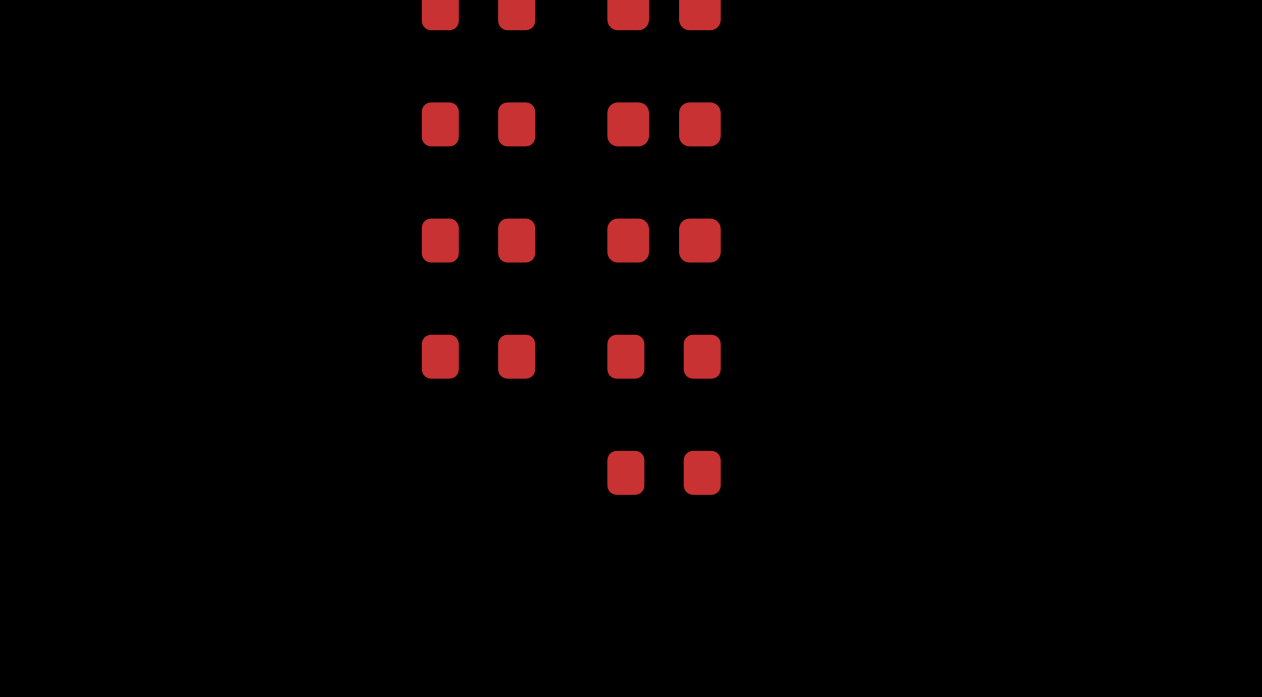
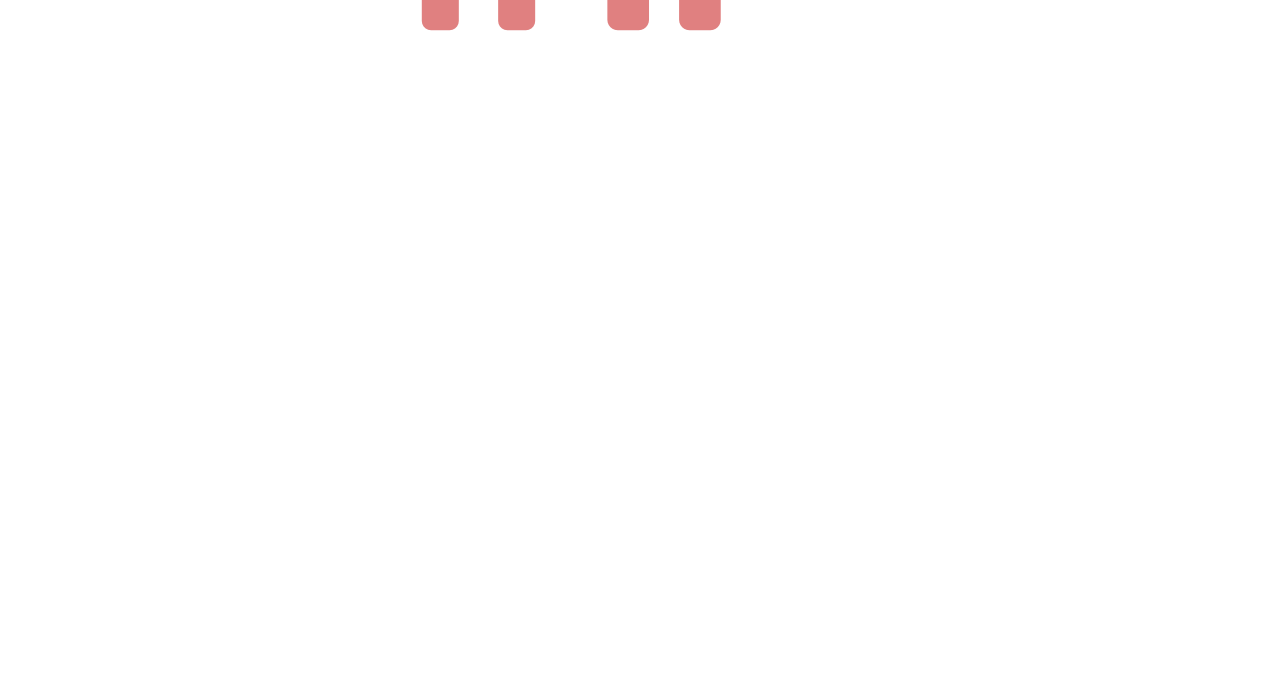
part: (478, 124) -> none
part: (664, 124) -> none
part: (478, 240) -> none
part: (664, 240) -> none
part: (478, 356) -> none
part: (664, 356) -> none
part: (664, 472) -> none

